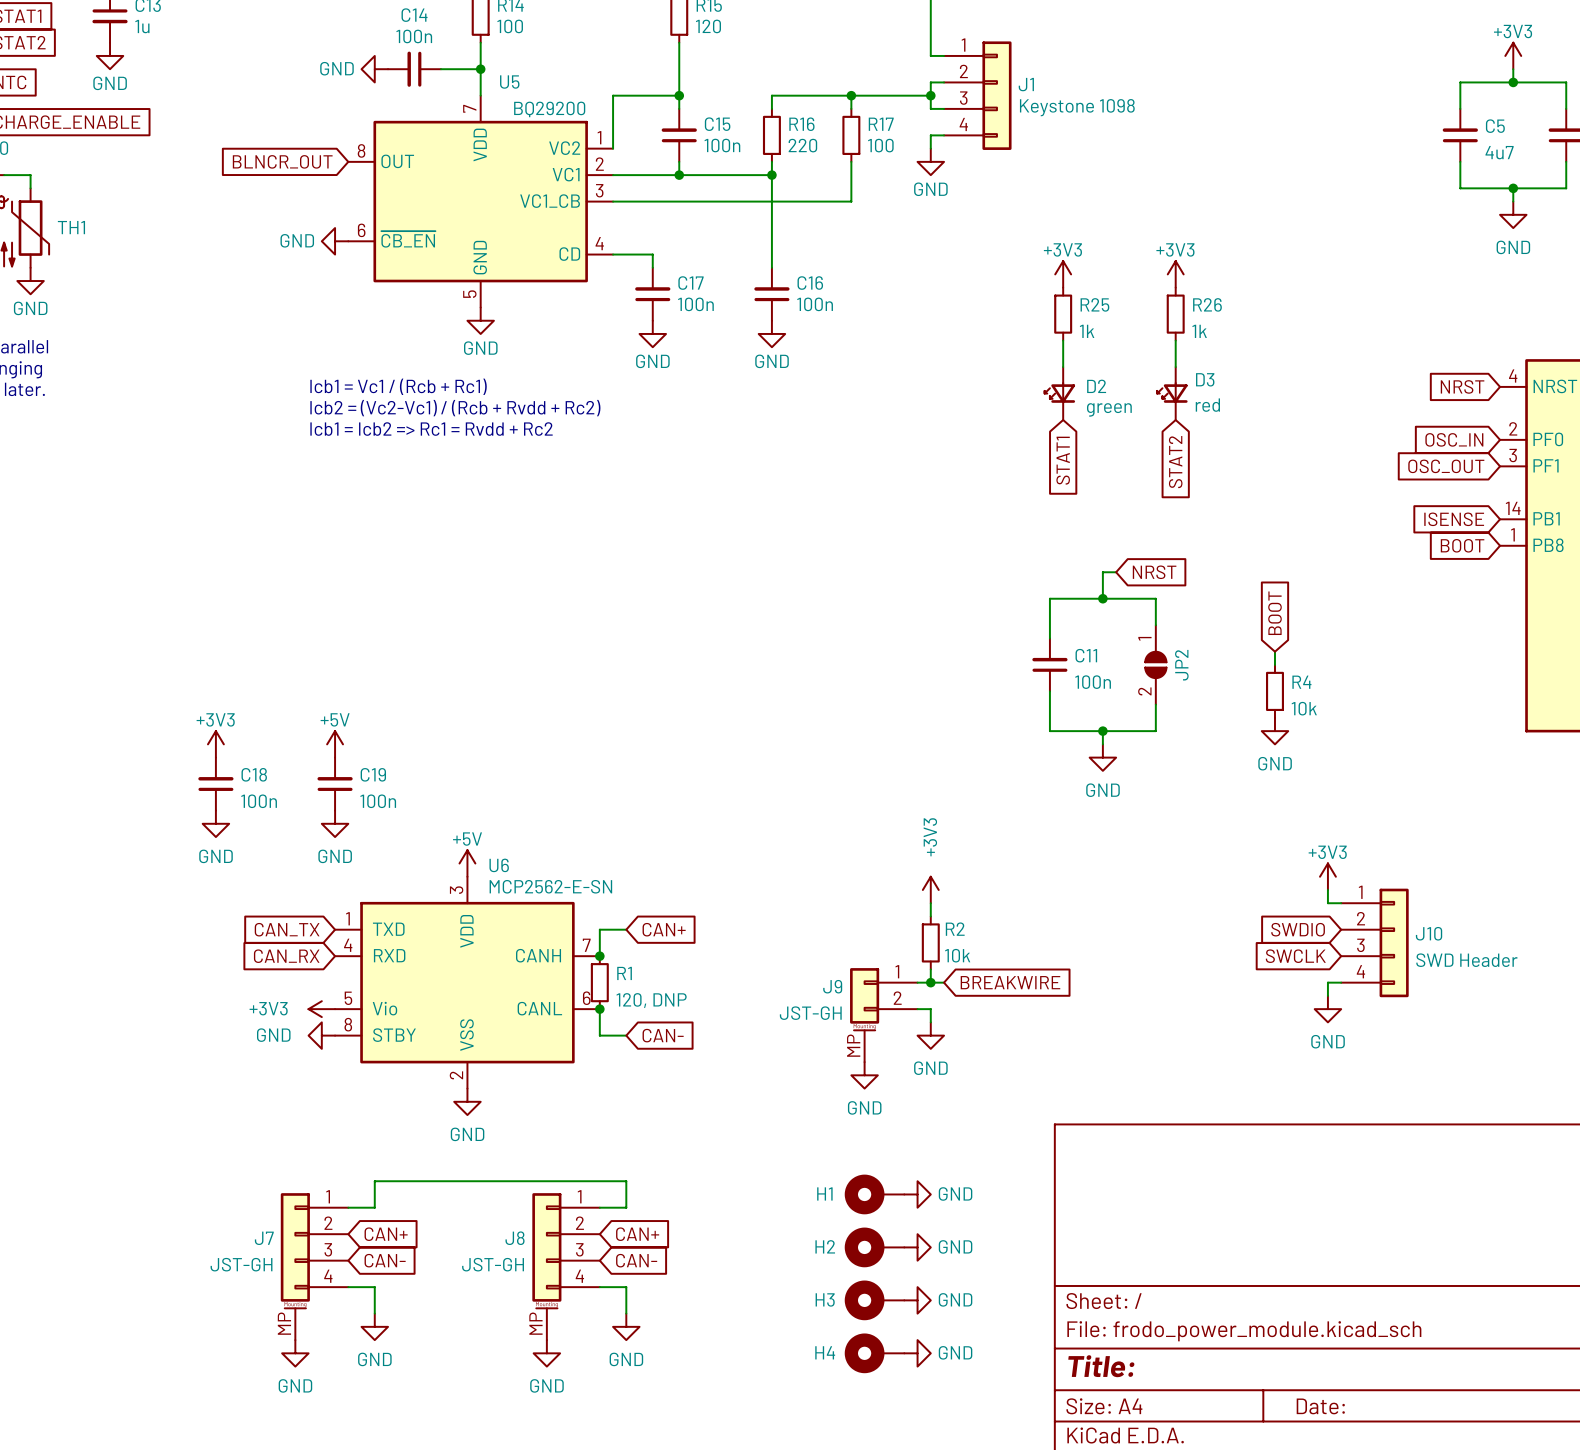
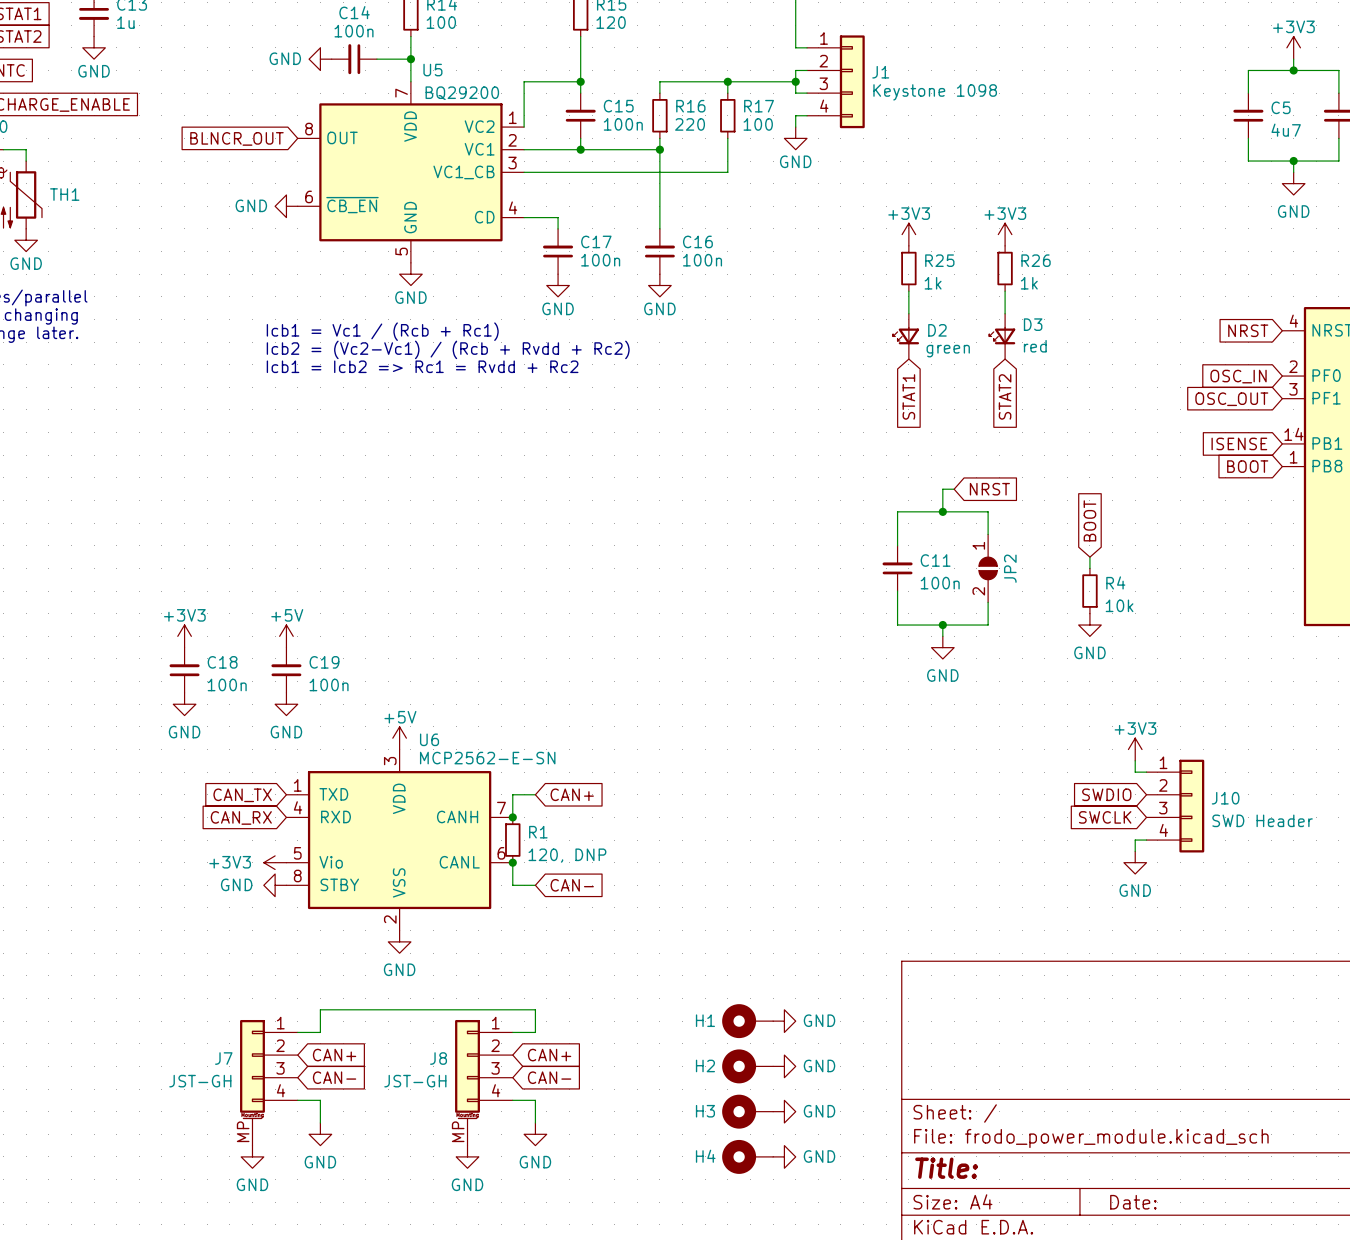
power symbol: +3V3 (930, 889) -> none
wire: (930, 903) (930, 916) -> none
R2: 10k (930, 942) -> none
wire: (930, 969) (930, 982) -> none
wire: (917, 982) (944, 982) -> none
junction: (930, 982) -> none
global label: BREAKWIRE (1010, 982) -> none
wire: (917, 1009) (930, 1009) (930, 1022) -> none
J9: JST-GH (883, 1015) -> none
power symbol: GND (930, 1035) -> none
power symbol: GND (864, 1075) -> none

